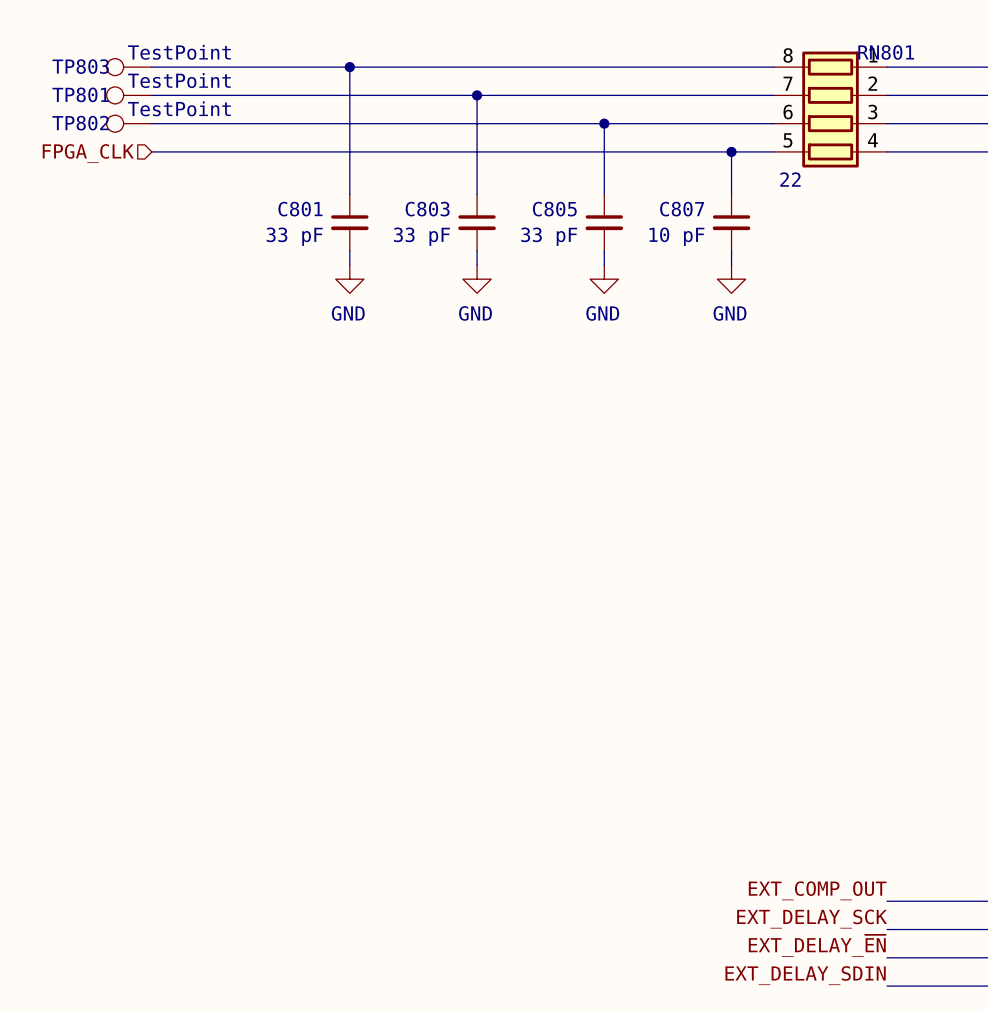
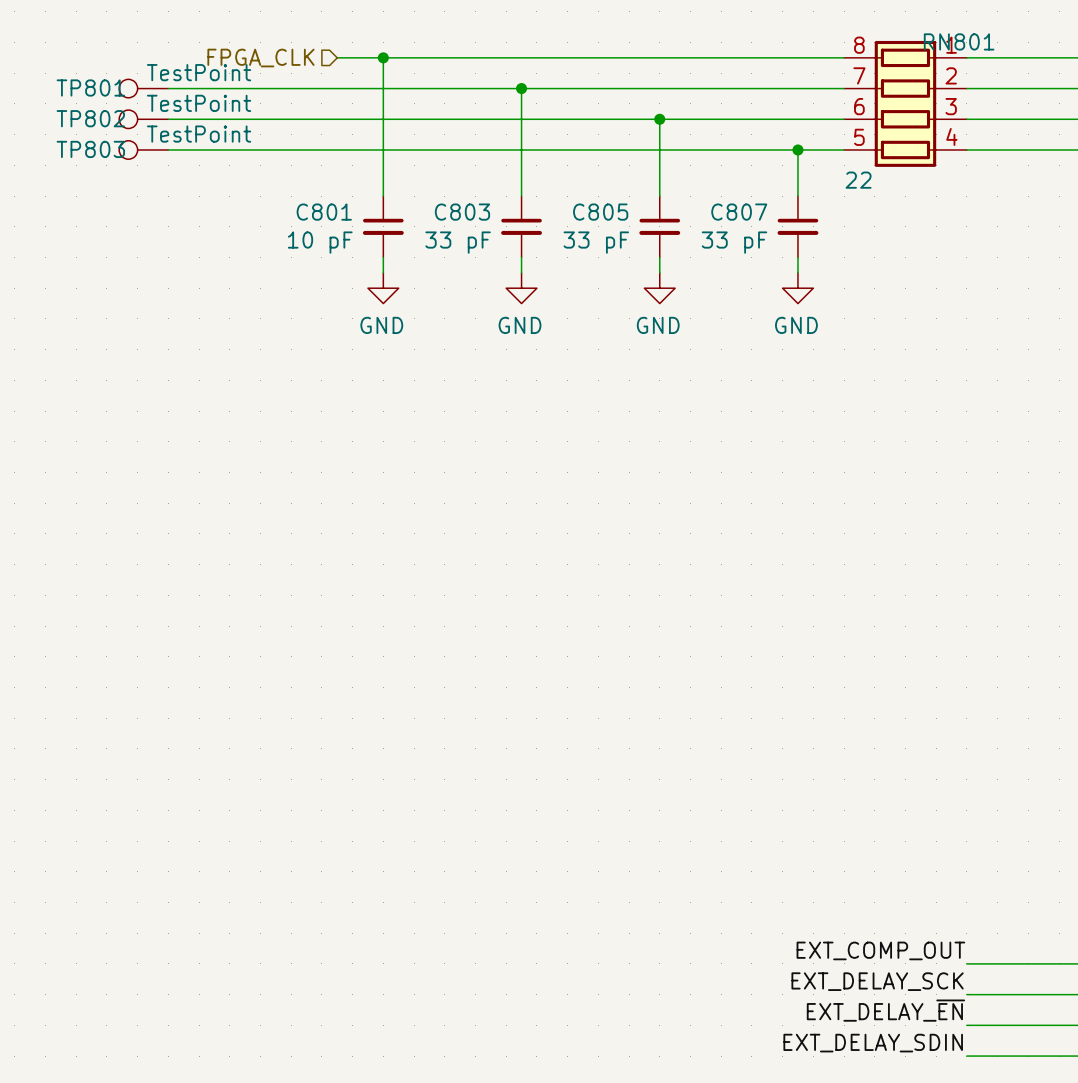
TP803 position: (129, 67) -> (143, 150)
wire: (151, 67) (307, 67) -> none
hierarchical label position: FPGA_CLK (88, 153) -> FPGA_CLK (260, 58)
C801 value: 33 pF (294, 236) -> 10 pF (320, 242)
C807 value: 10 pF (676, 236) -> 33 pF (734, 242)

